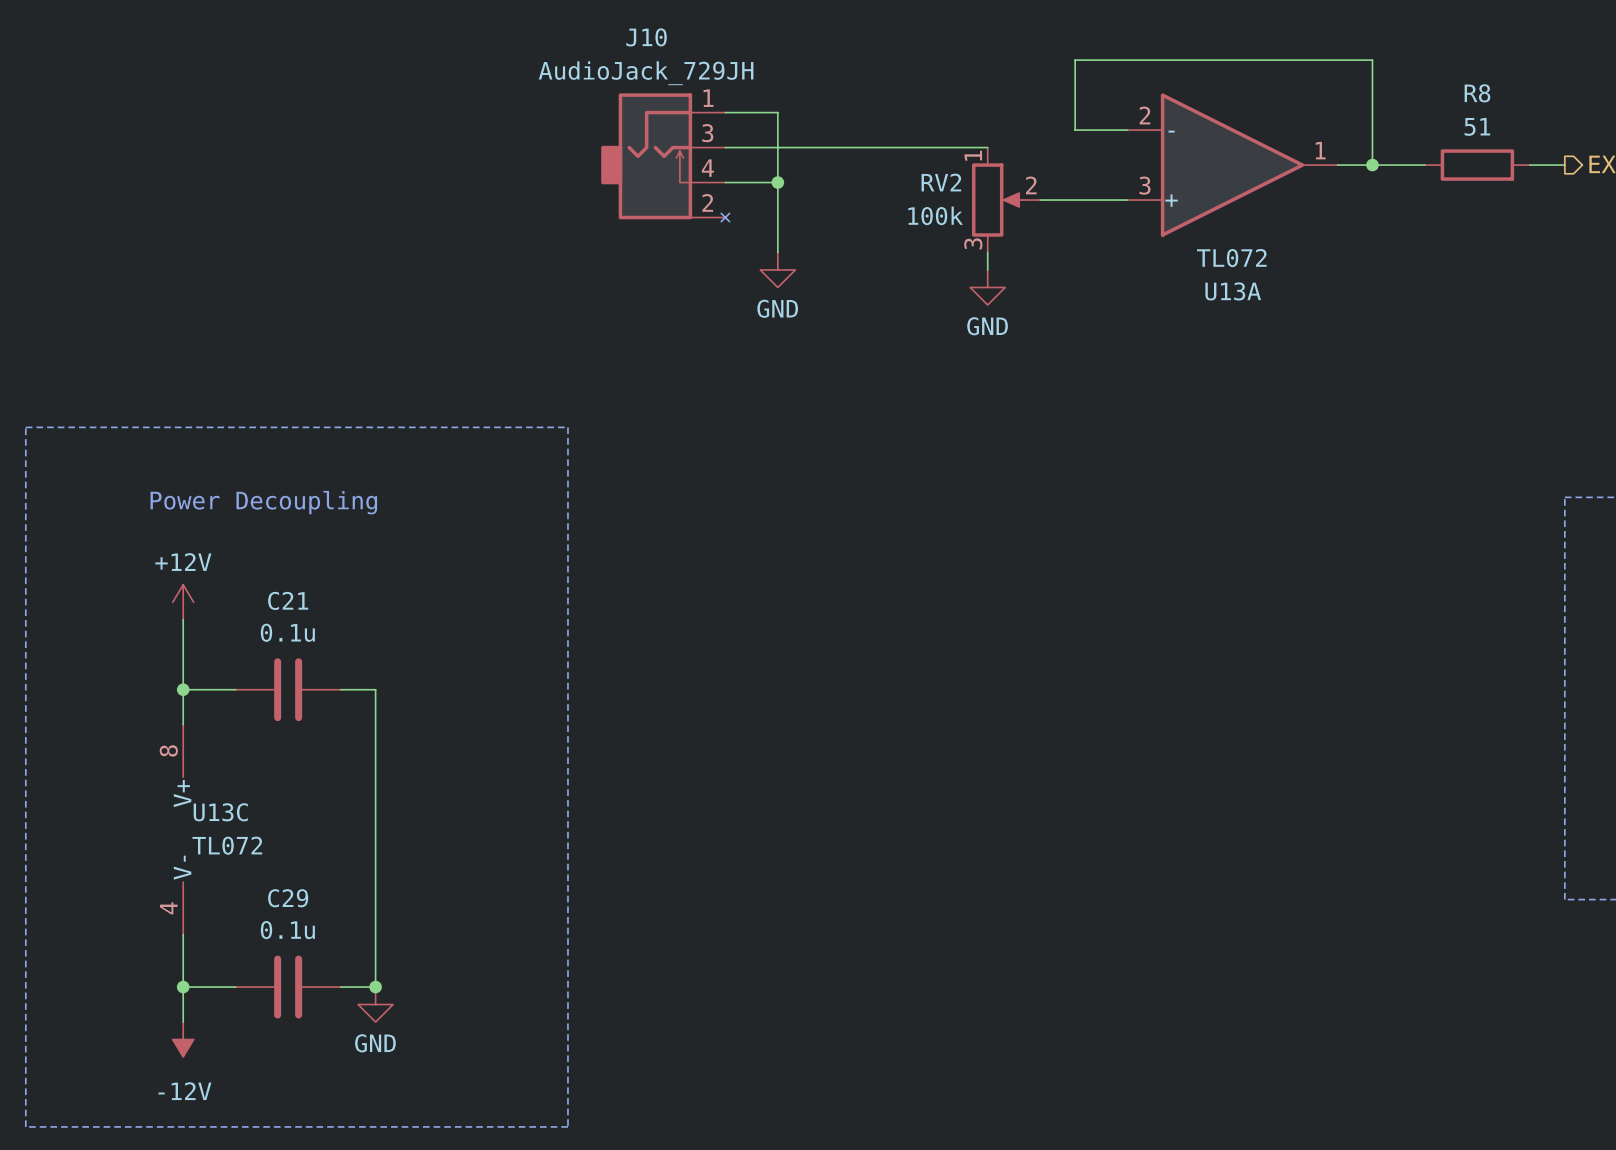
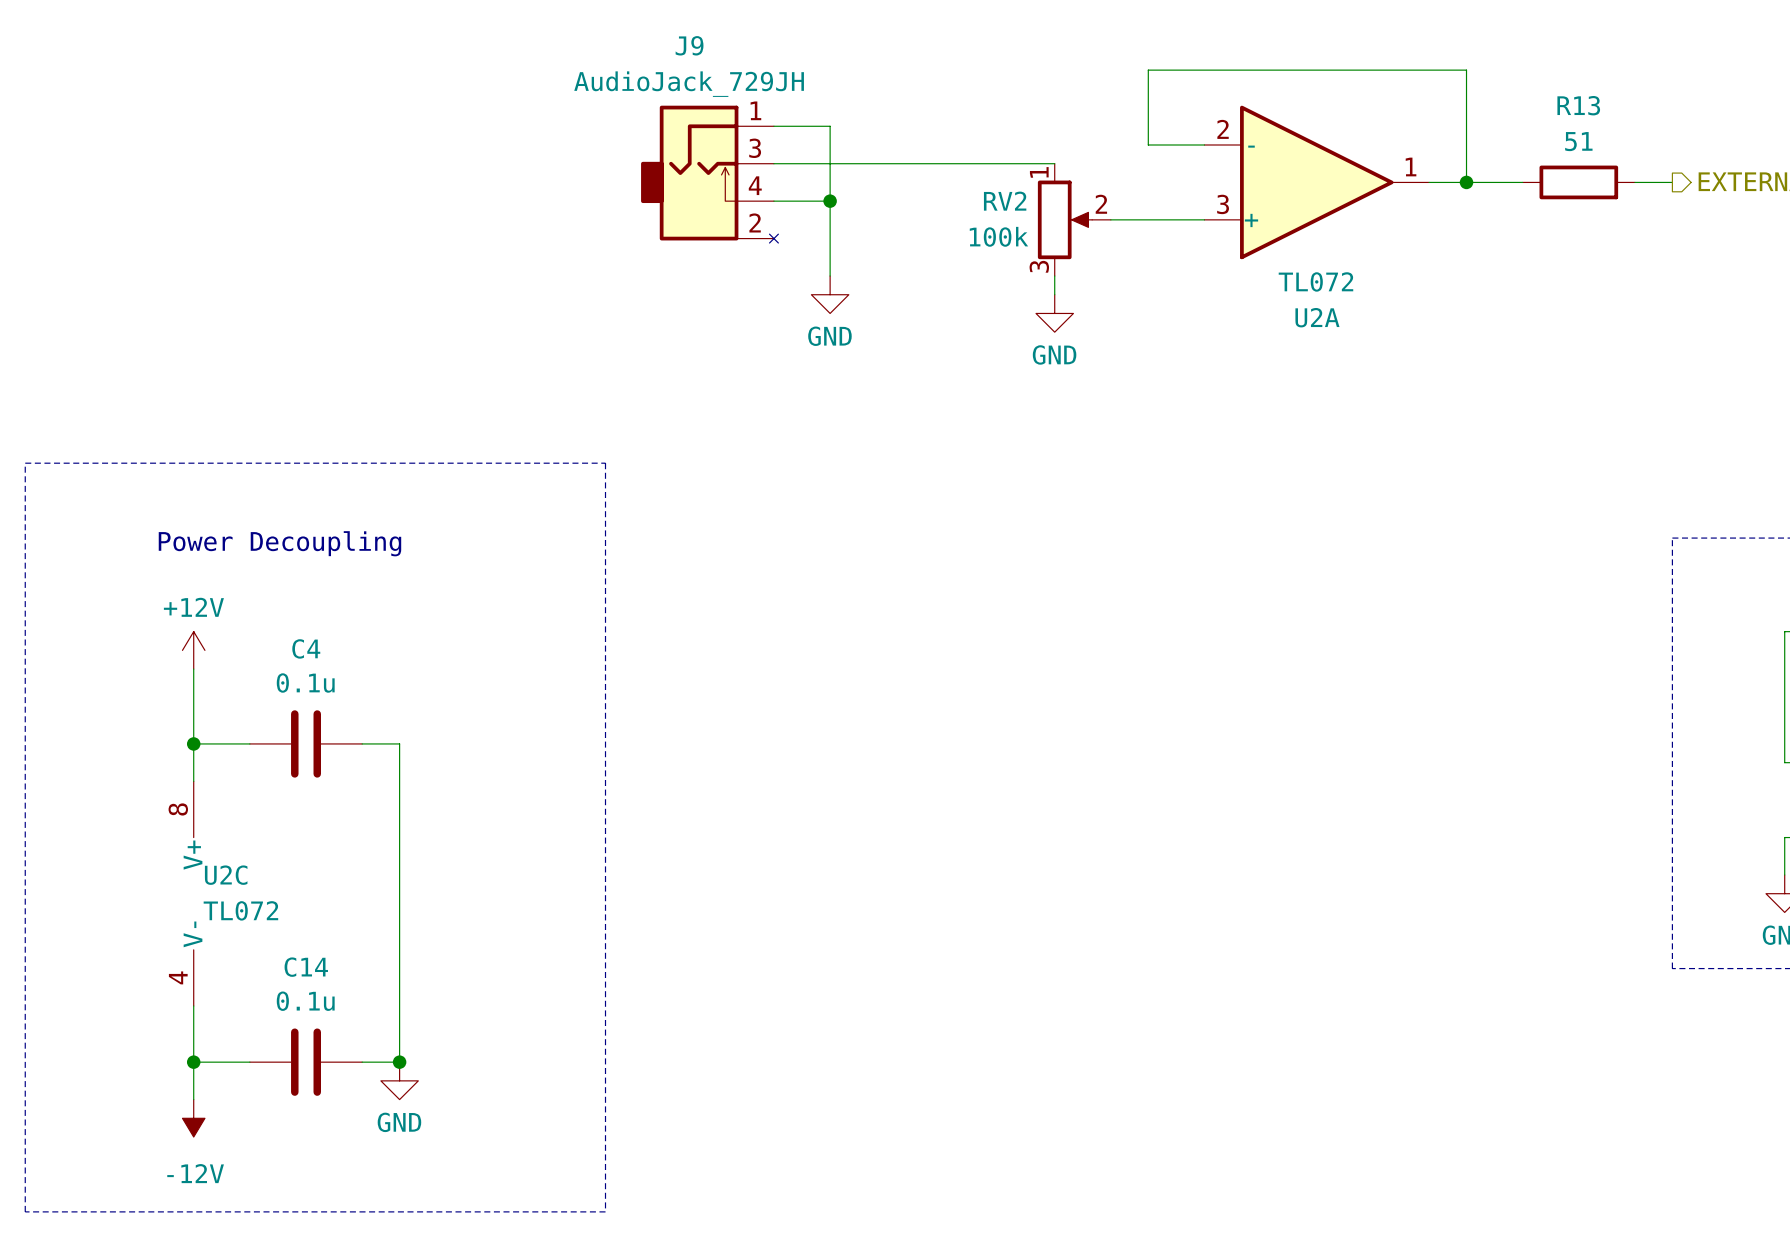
J10 name: J10 (646, 37) -> J9 (689, 45)
R8 name: R8 (1477, 93) -> R13 (1578, 105)
U13A name: U13A (1233, 291) -> U2A (1317, 317)
C21 name: C21 (288, 600) -> C4 (306, 648)
U13C name: U13C (220, 812) -> U2C (226, 875)
C29 name: C29 (288, 898) -> C14 (306, 967)

